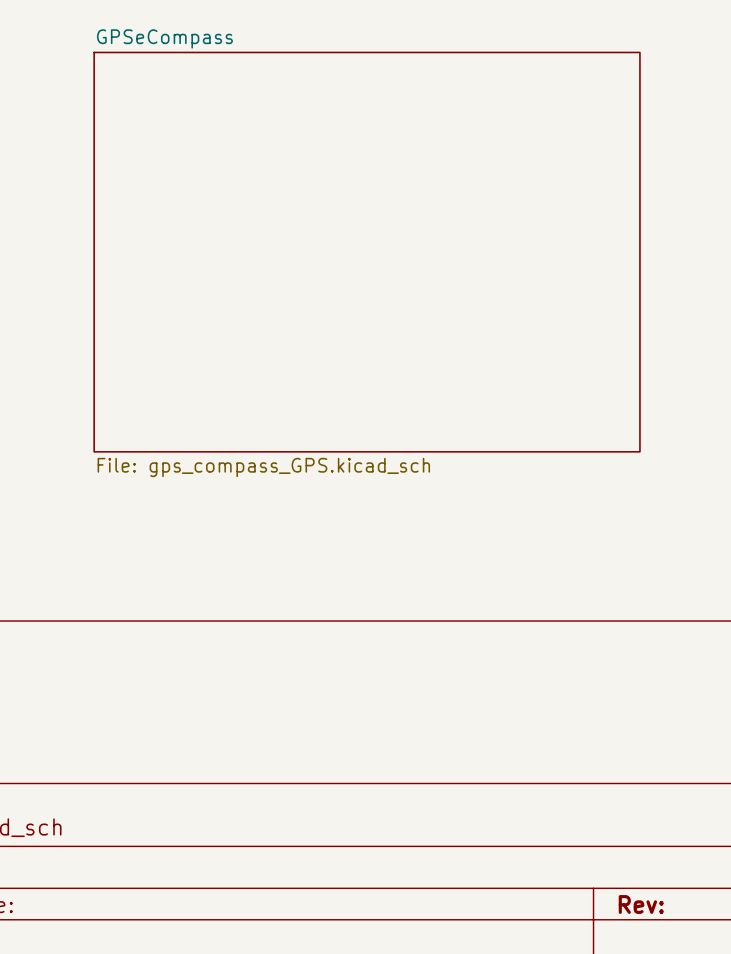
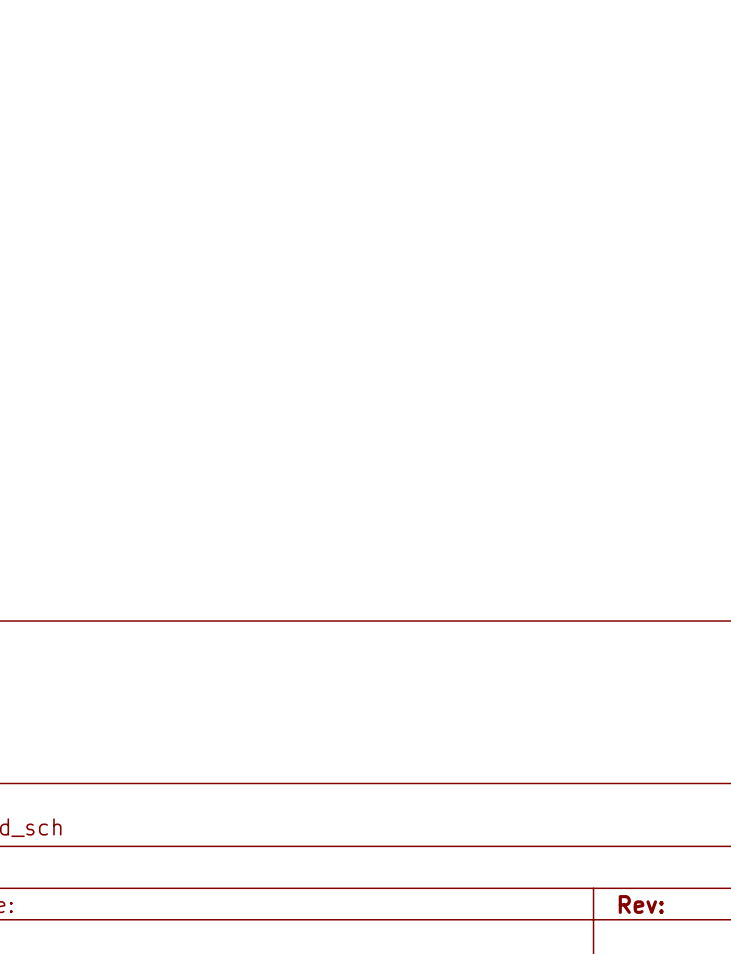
sheet GPSeCompass: File: gps_compass_GPS.kicad_sch (367, 252) -> none

